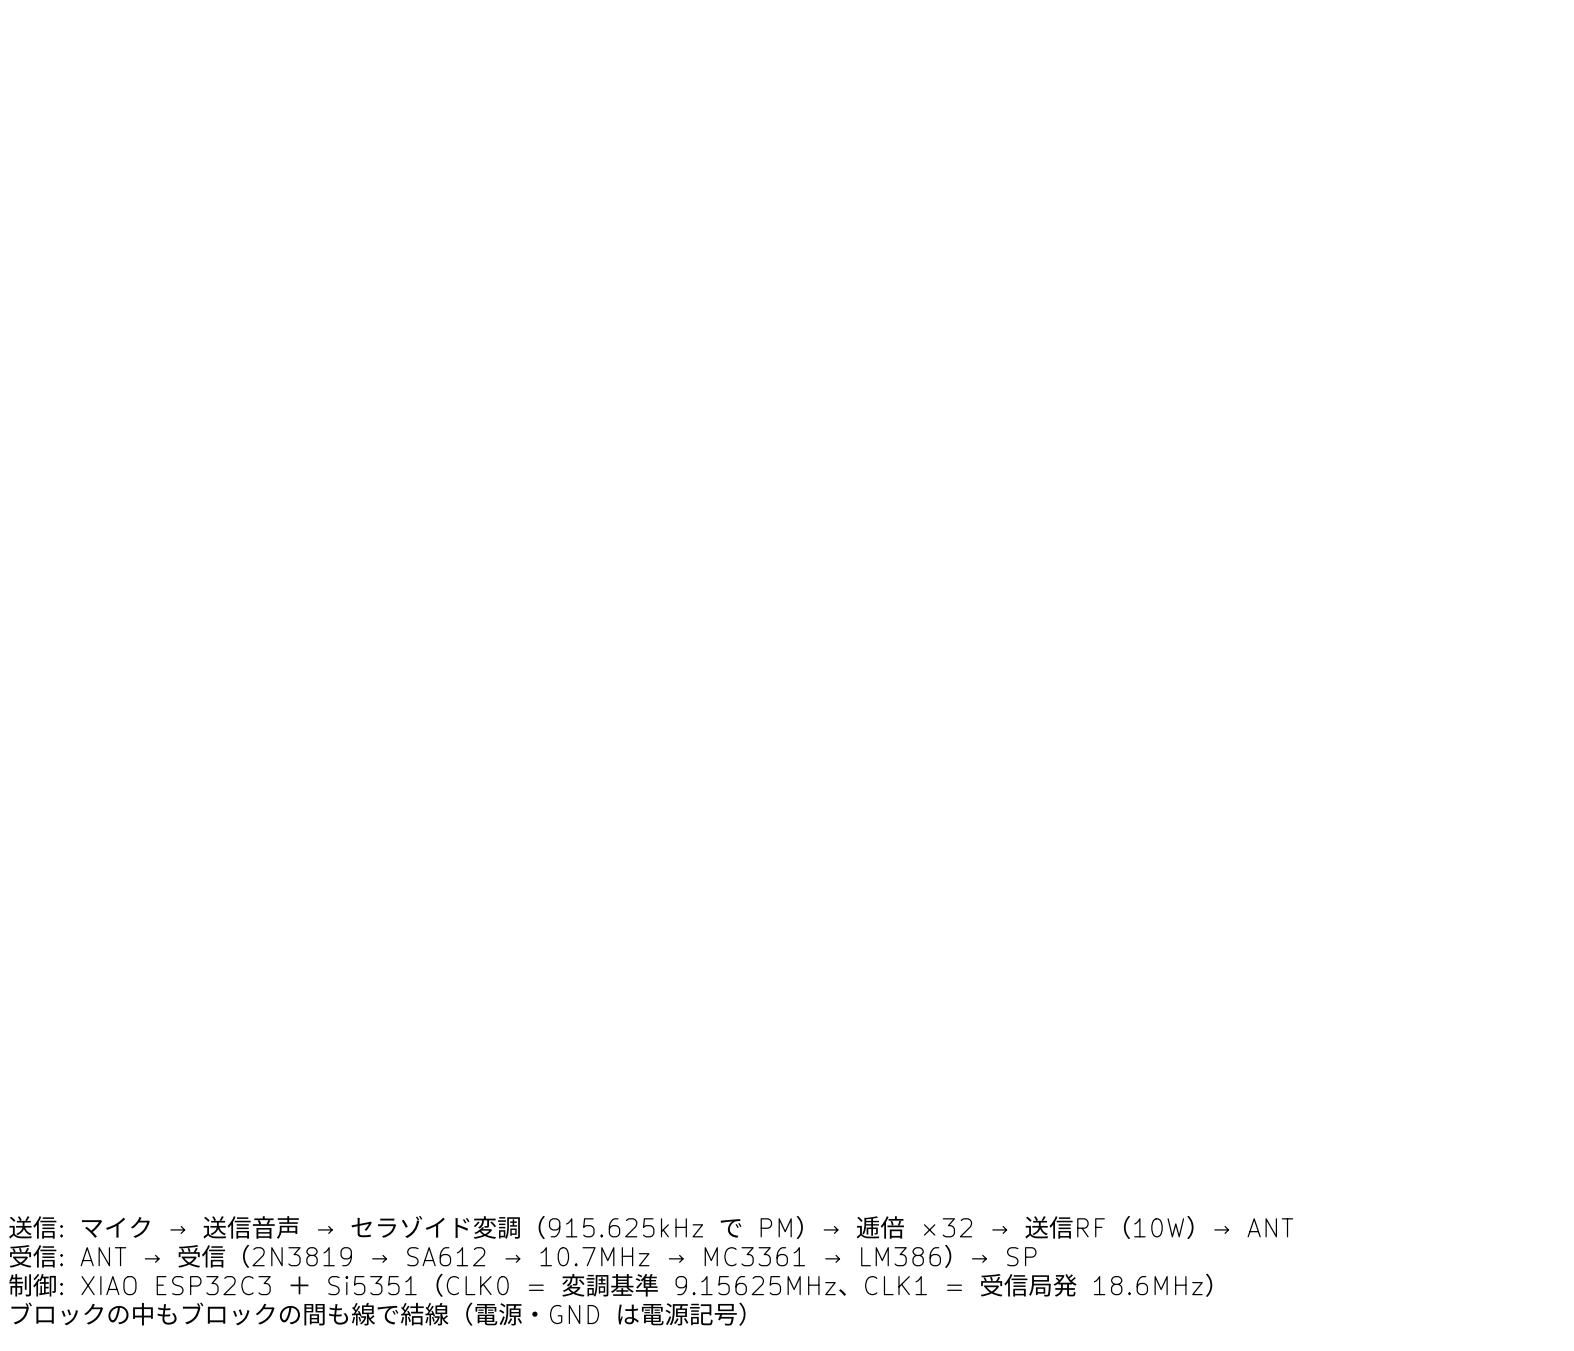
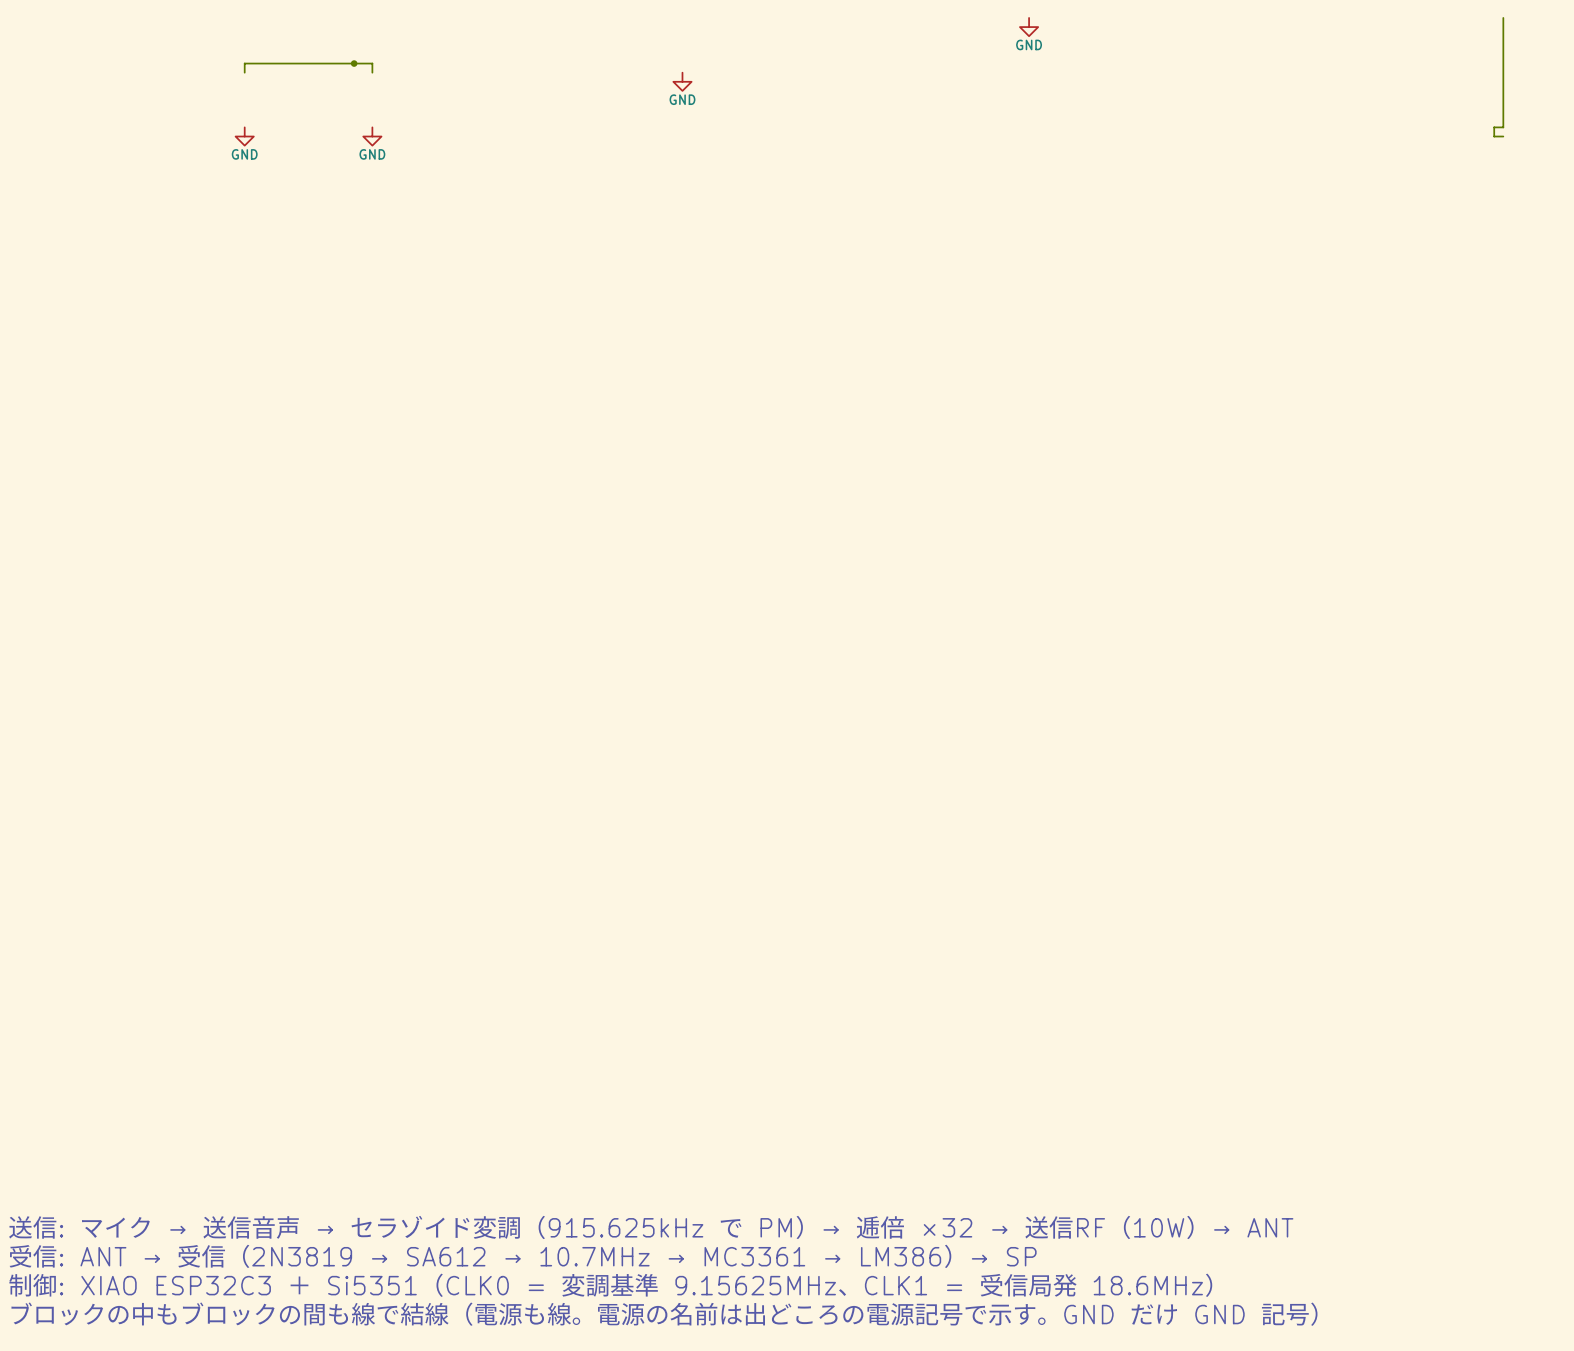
wire: none -> (1503, 17) (1503, 127) (1494, 127) (1494, 136) (1503, 136)
power symbol: none -> GND (1029, 27)
junction: none -> (354, 63)
wire: none -> (244, 72) (244, 63) (372, 63) (372, 72)
power symbol: none -> GND (682, 81)
power symbol: none -> GND (244, 136)
power symbol: none -> GND (372, 136)
text: ブロックの中もブロックの間も線で結線（電源・GND は電源記号） (378, 1314) -> ブロックの中もブロックの間も線で結線（電源も線。電源の名前は出どころの電源記号で示す。GND だけ GND 記号） (664, 1314)

